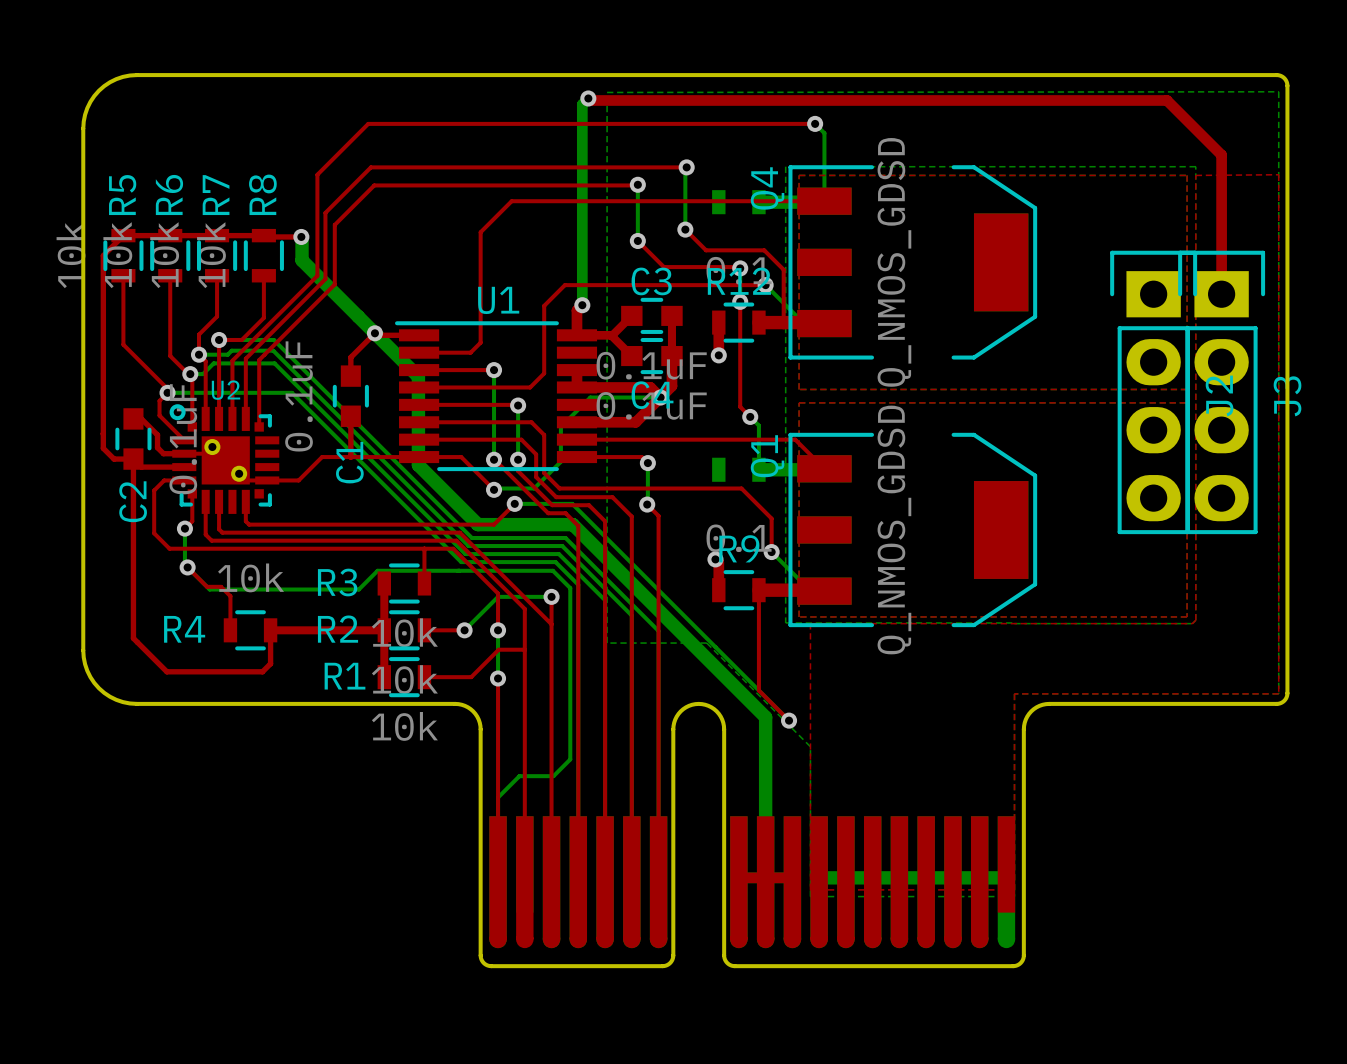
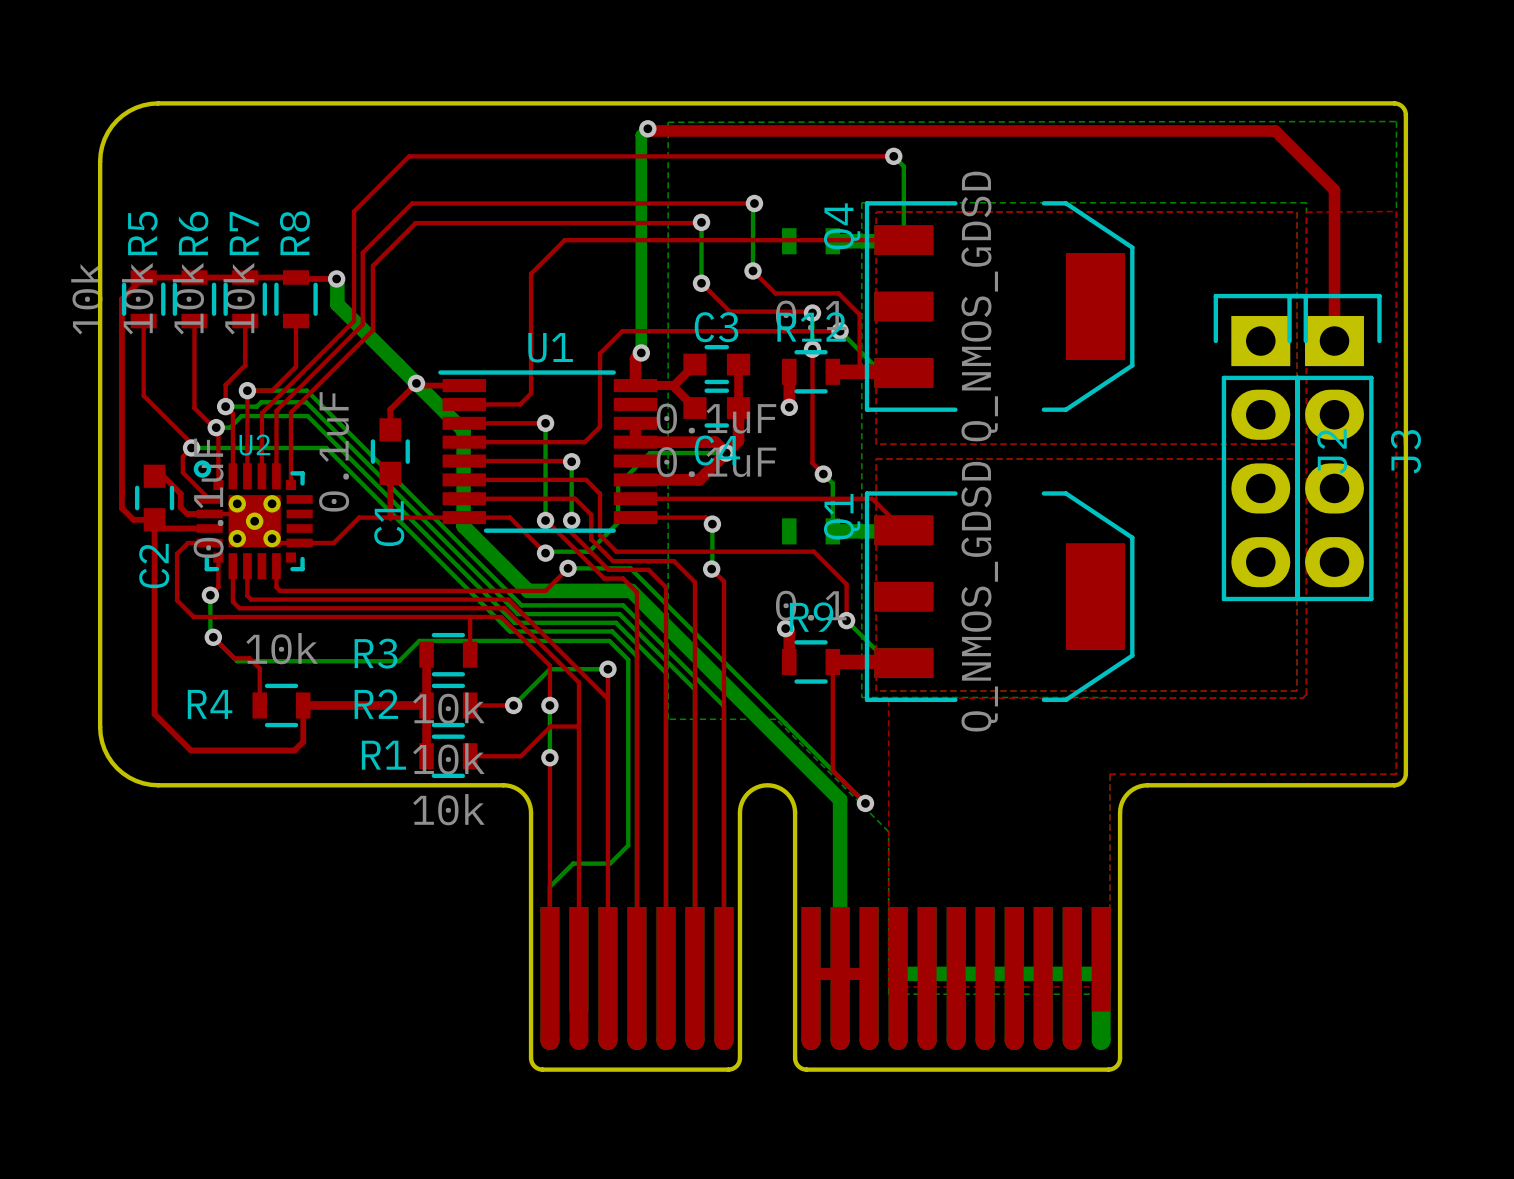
U2 footprint: [169, 404, 280, 514] -> [193, 460, 313, 580]

